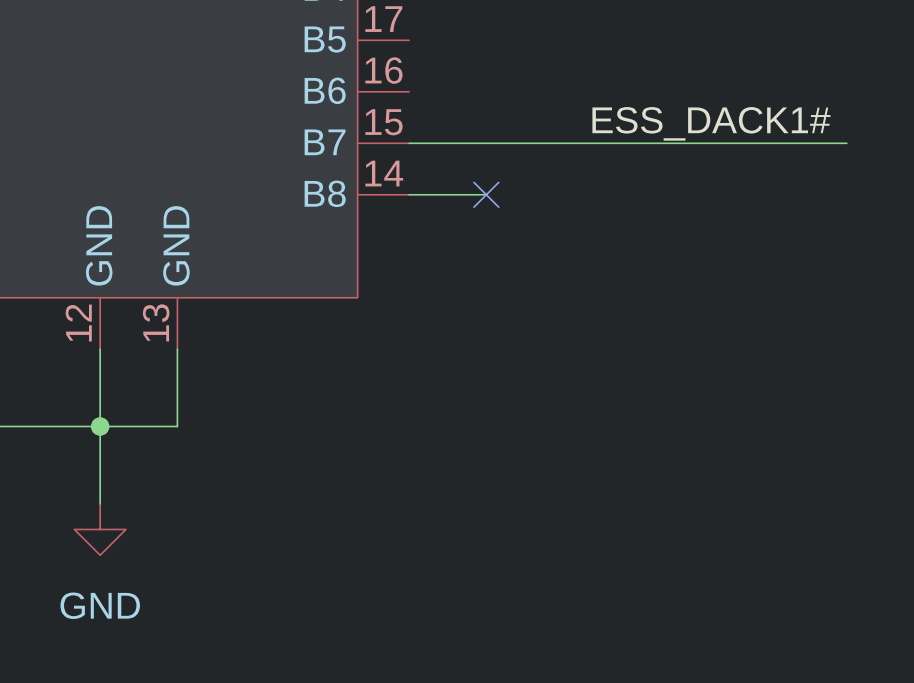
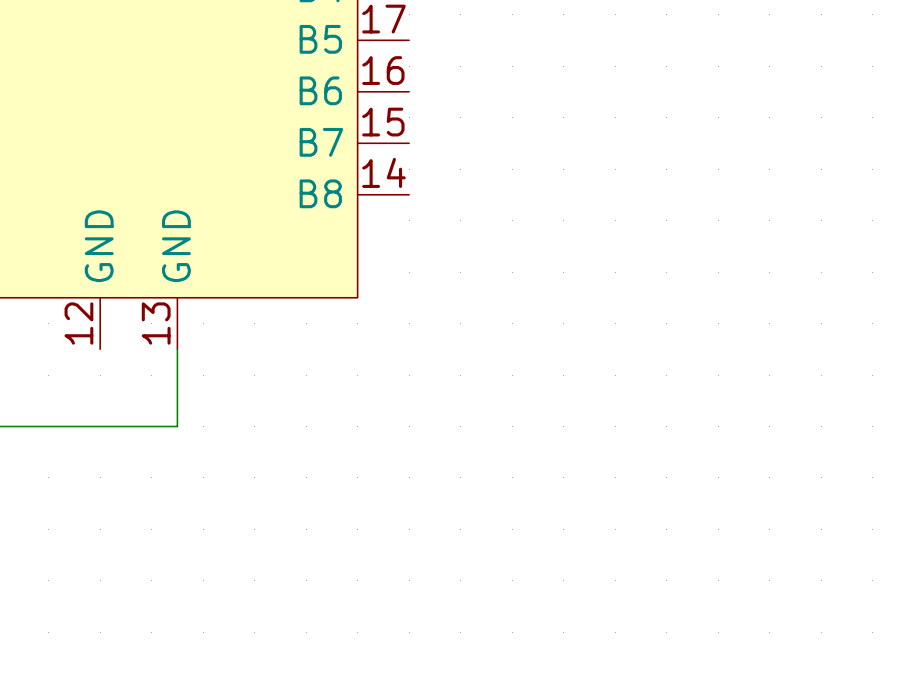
label: ESS_DACK1# (711, 123) -> none
wire: (409, 143) (846, 143) -> none
wire: (409, 194) (486, 194) -> none
no-connect mark: (486, 194) -> none
wire: (100, 349) (100, 503) -> none
junction: (100, 426) -> none
power symbol: GND (100, 529) -> none

